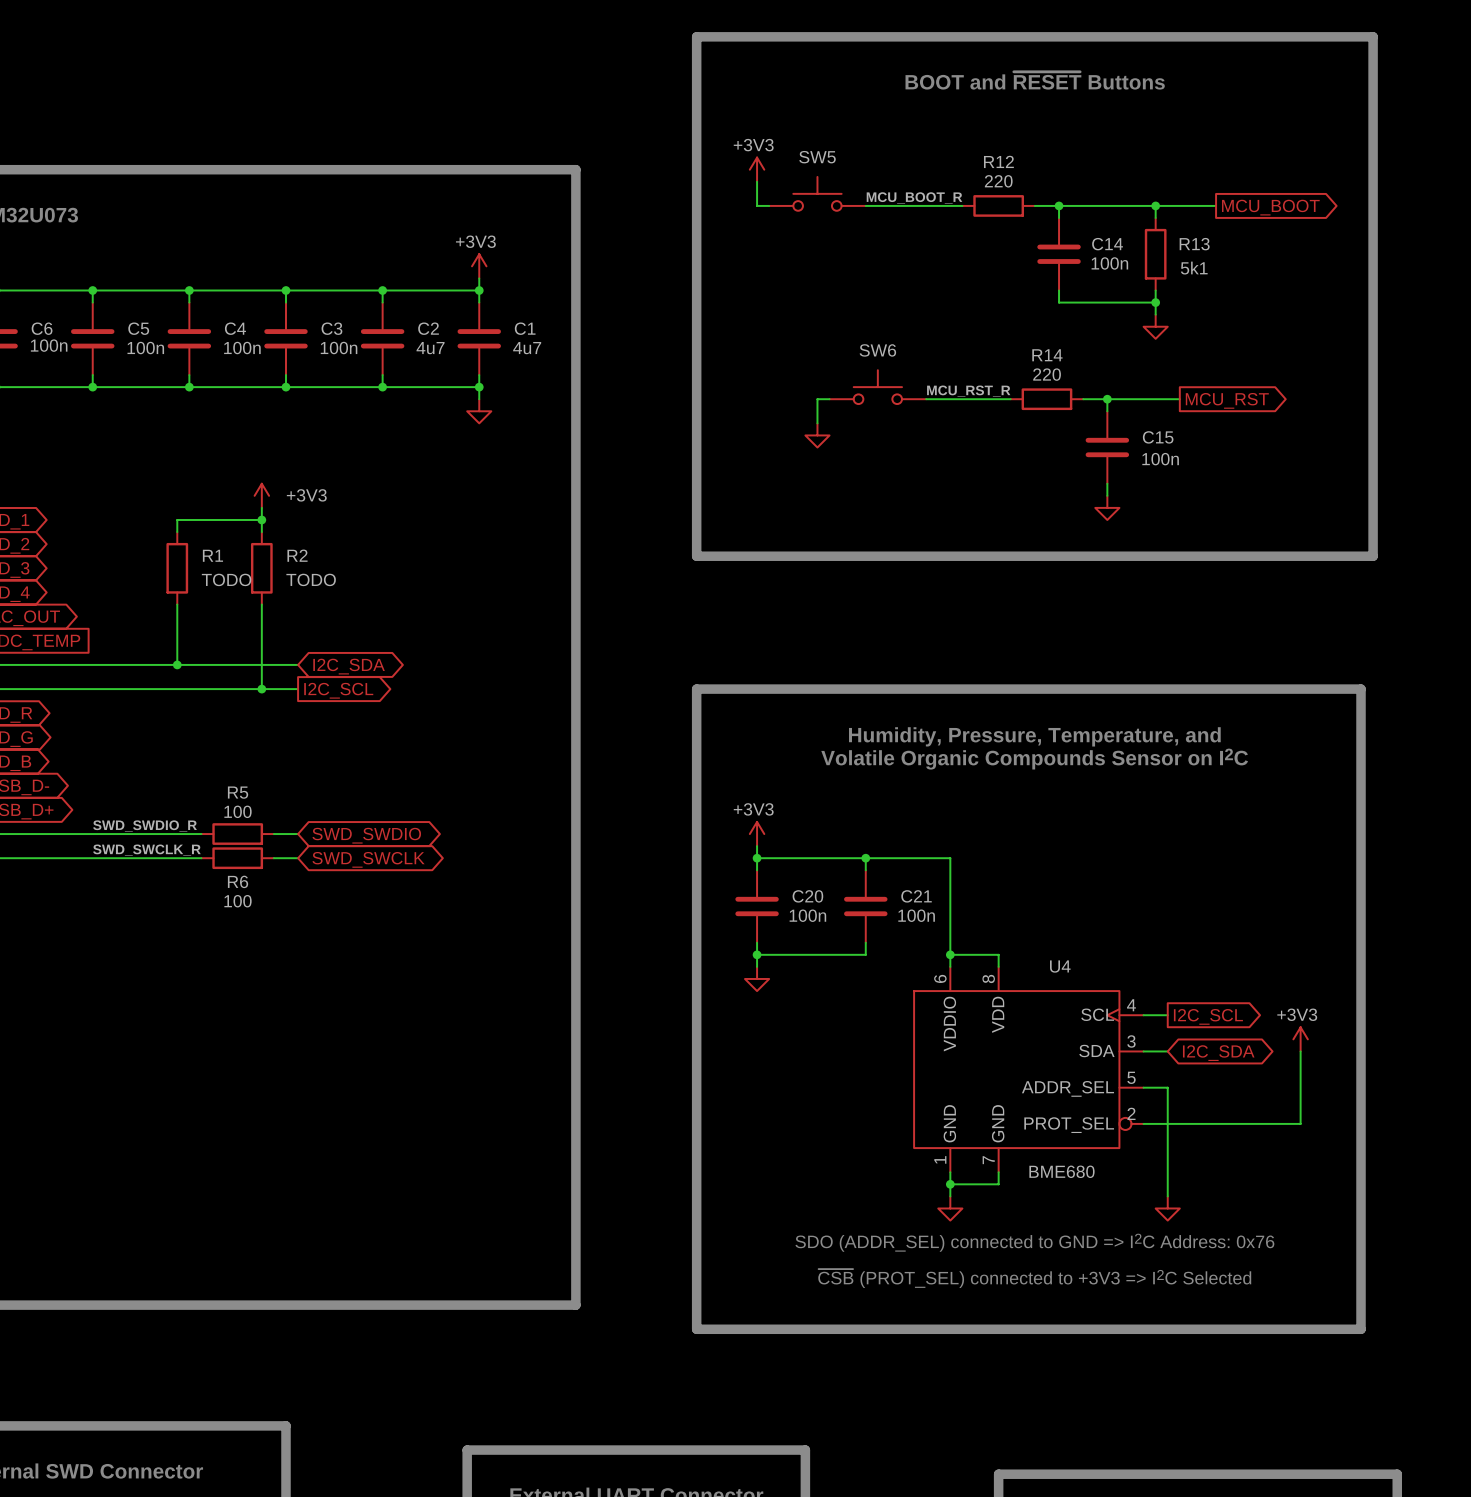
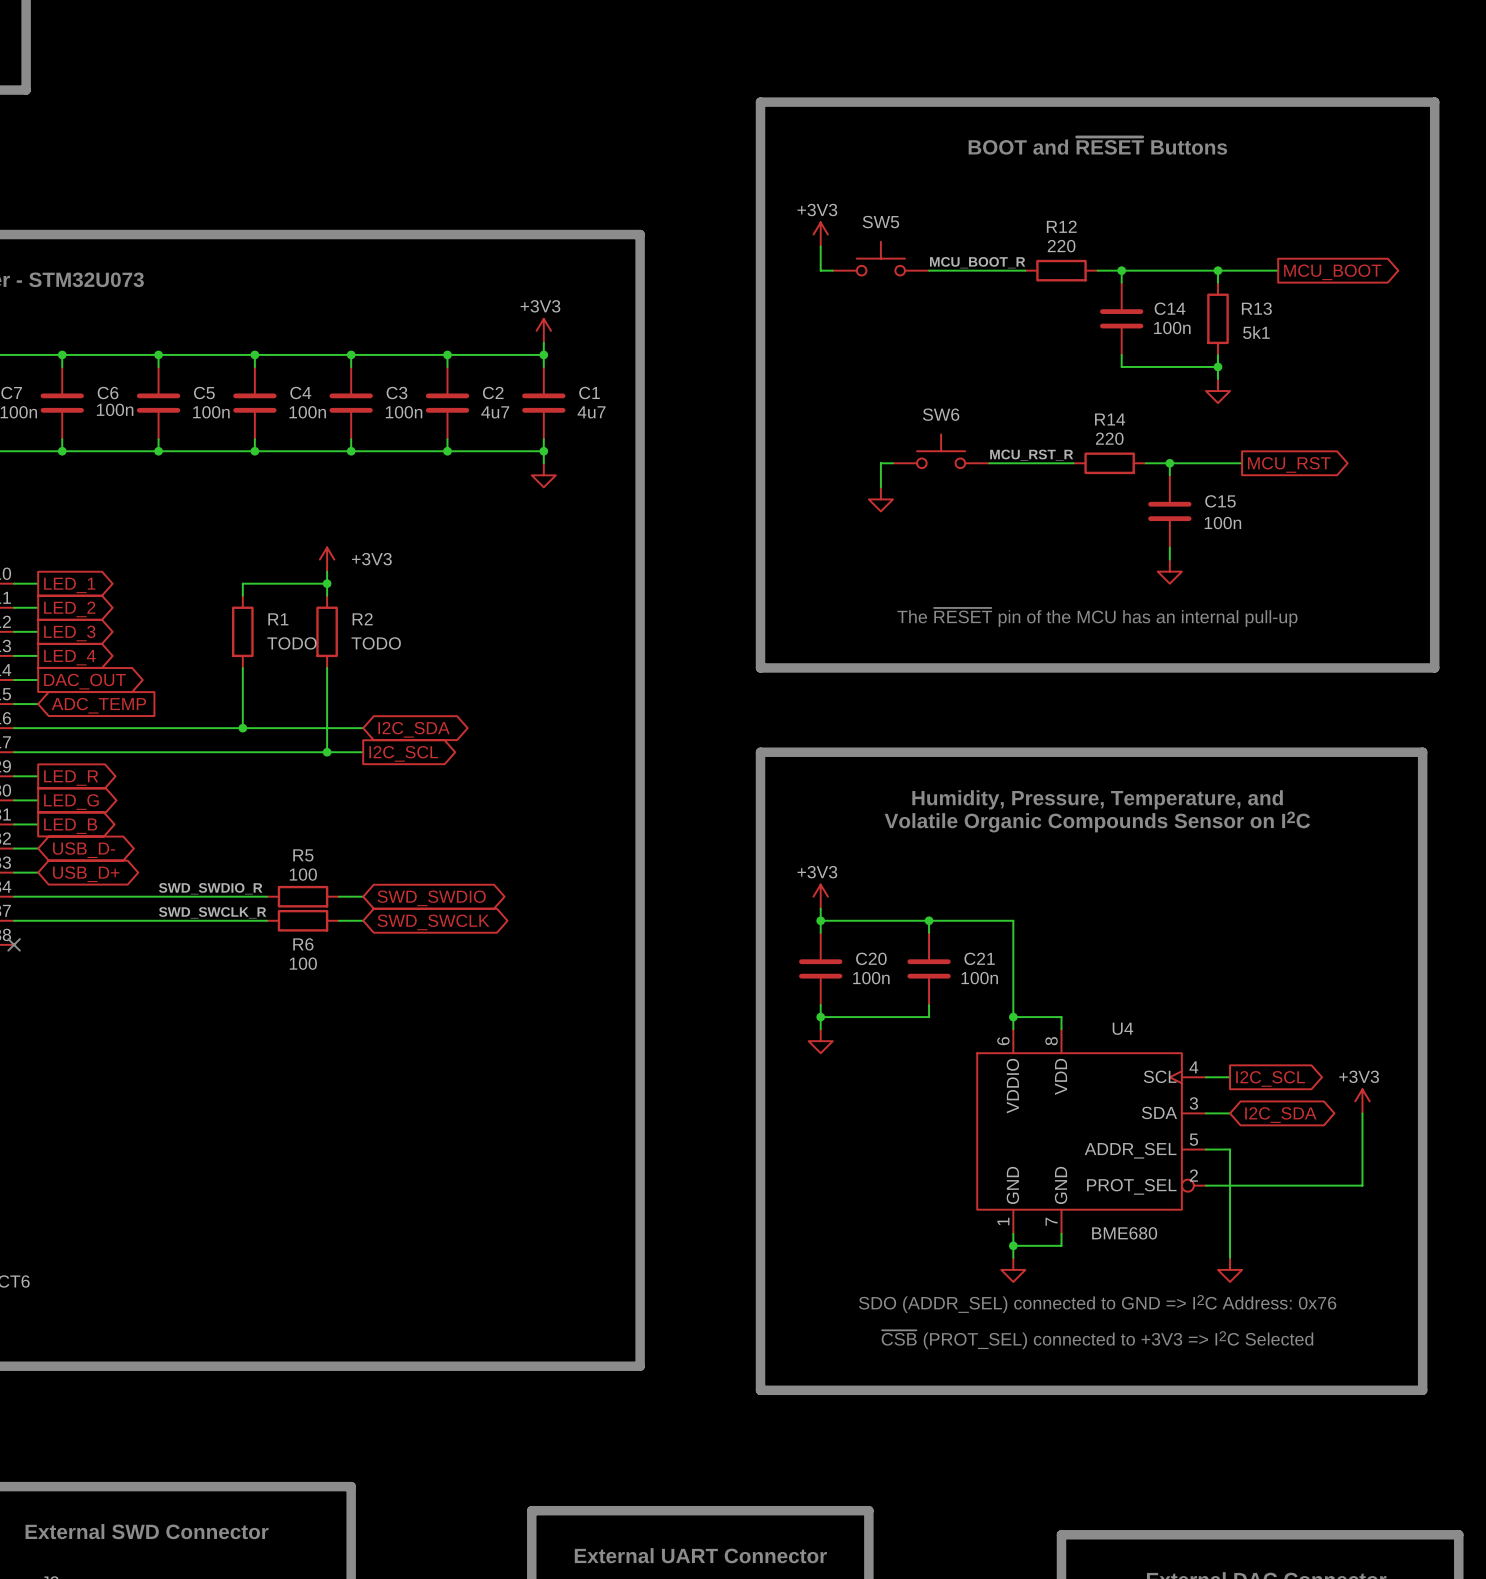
text: none -> The ~{RESET} pin of the MCU has an internal pull-up (1097, 617)
line: (696, 556) (1373, 556) -> (760, 619) (760, 667) (1434, 667) (1434, 619)

